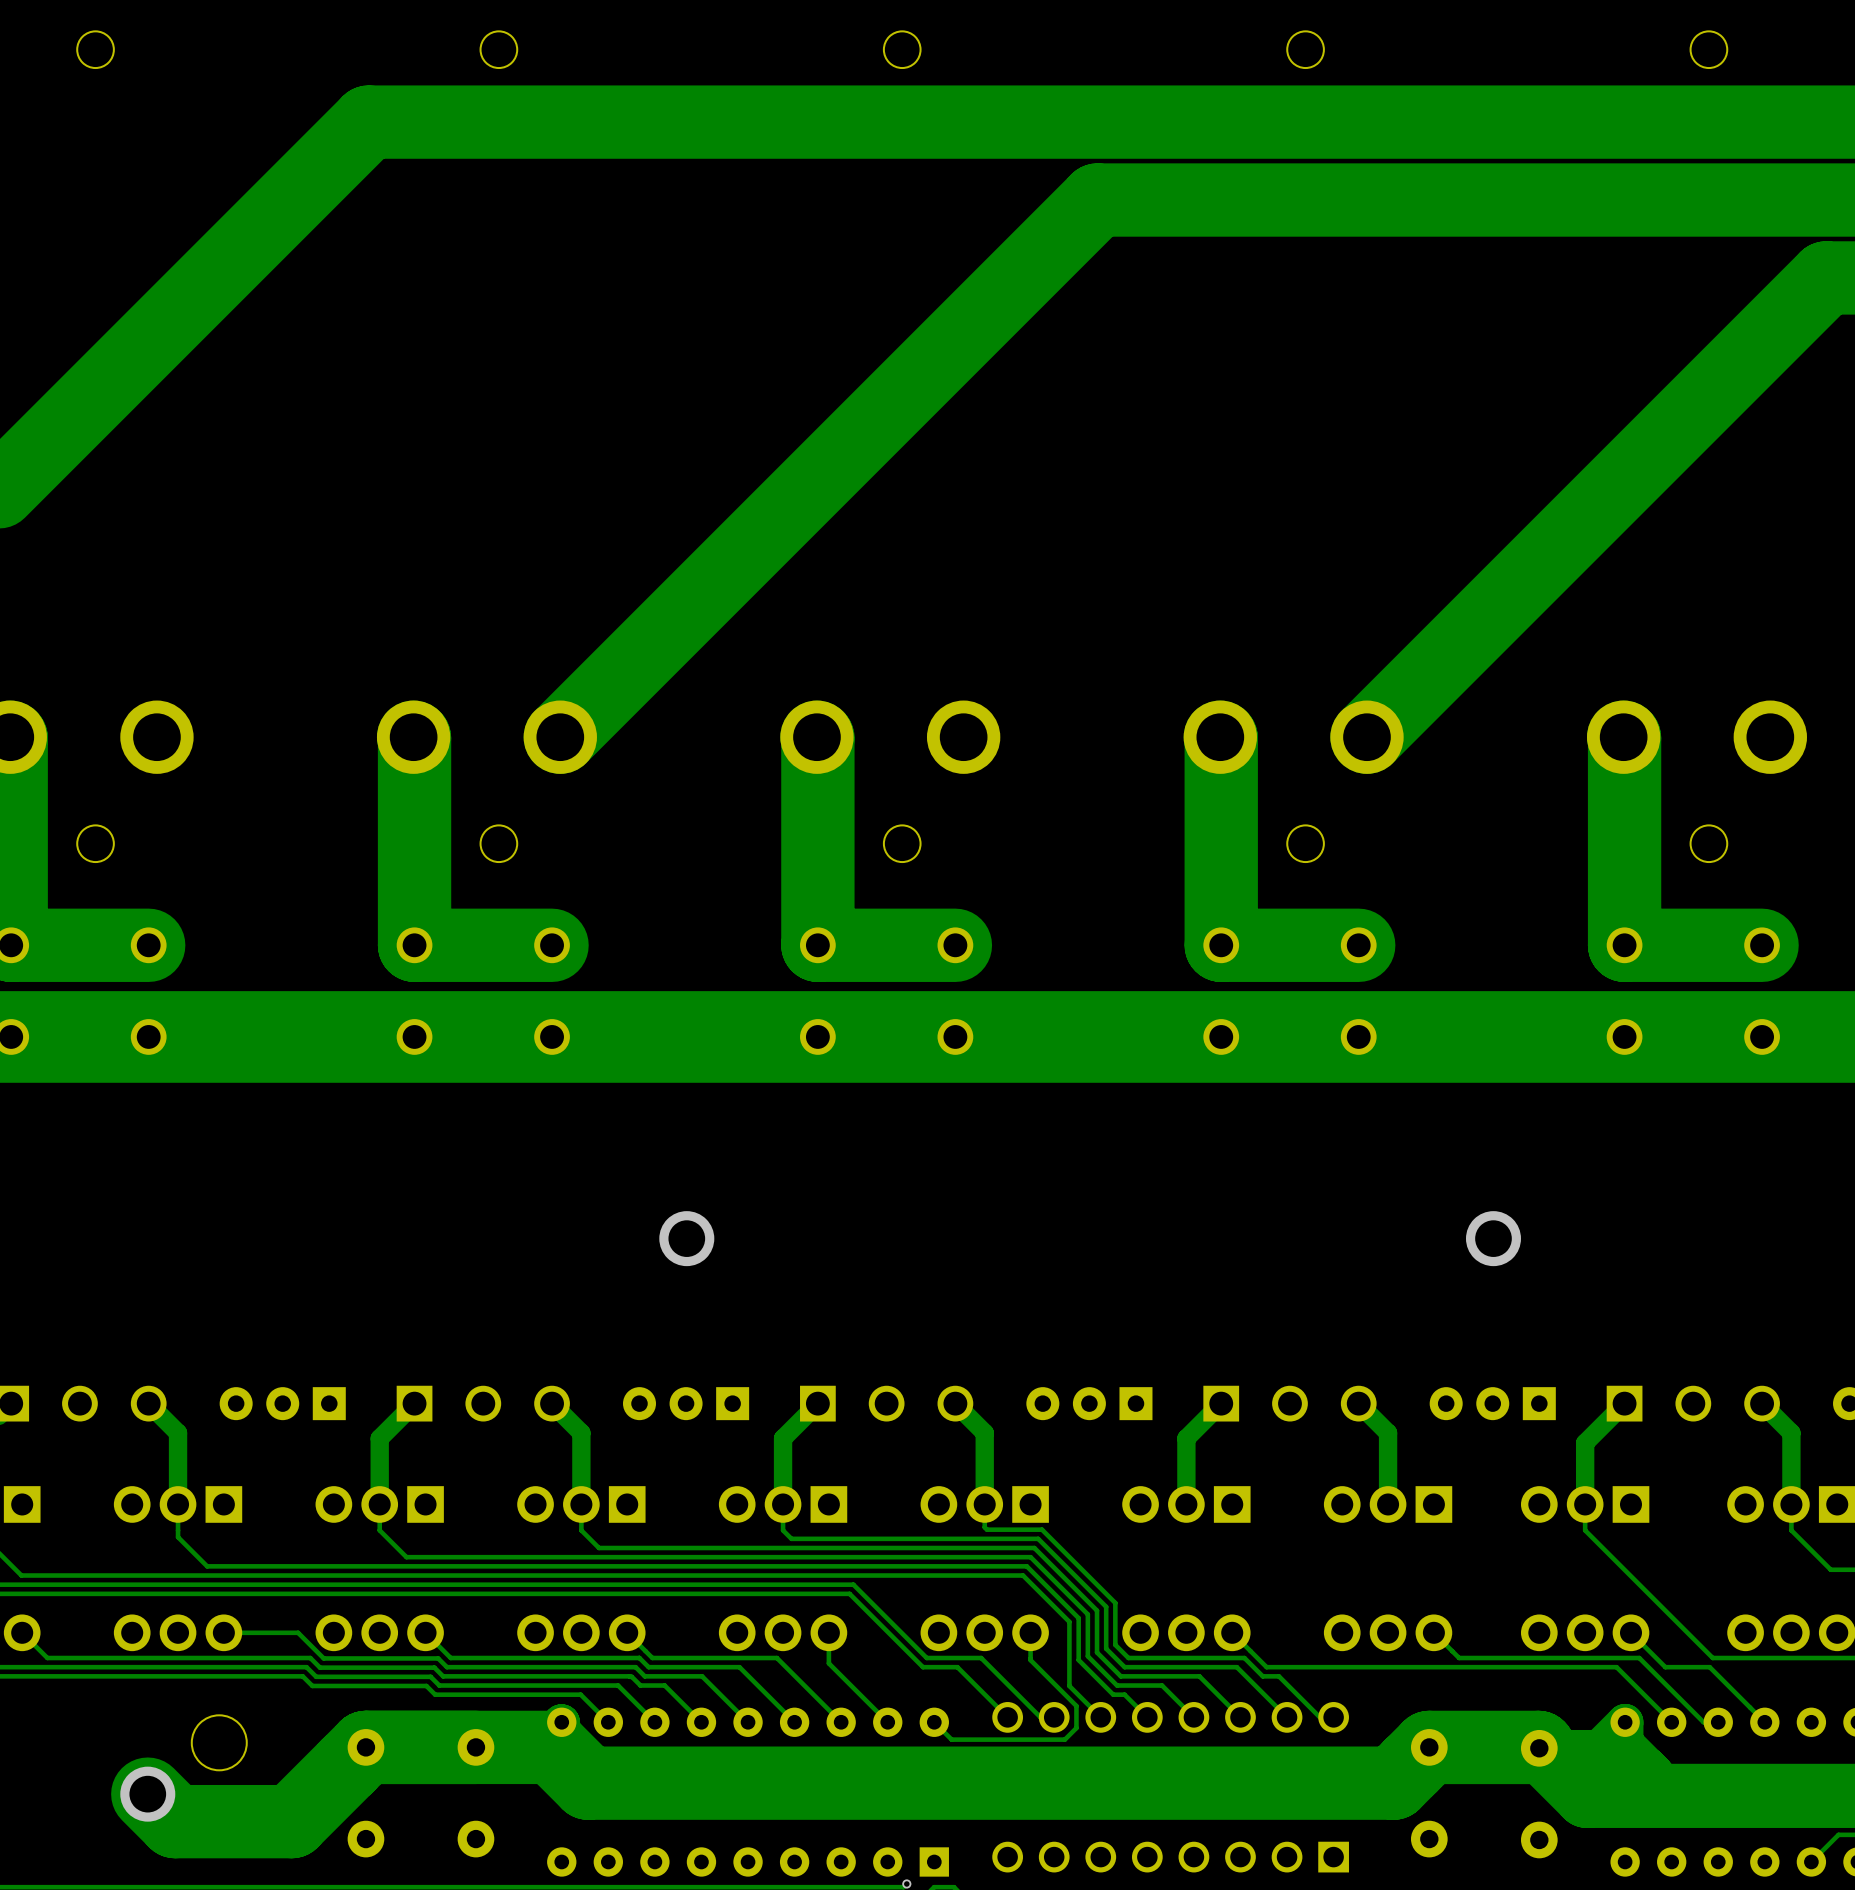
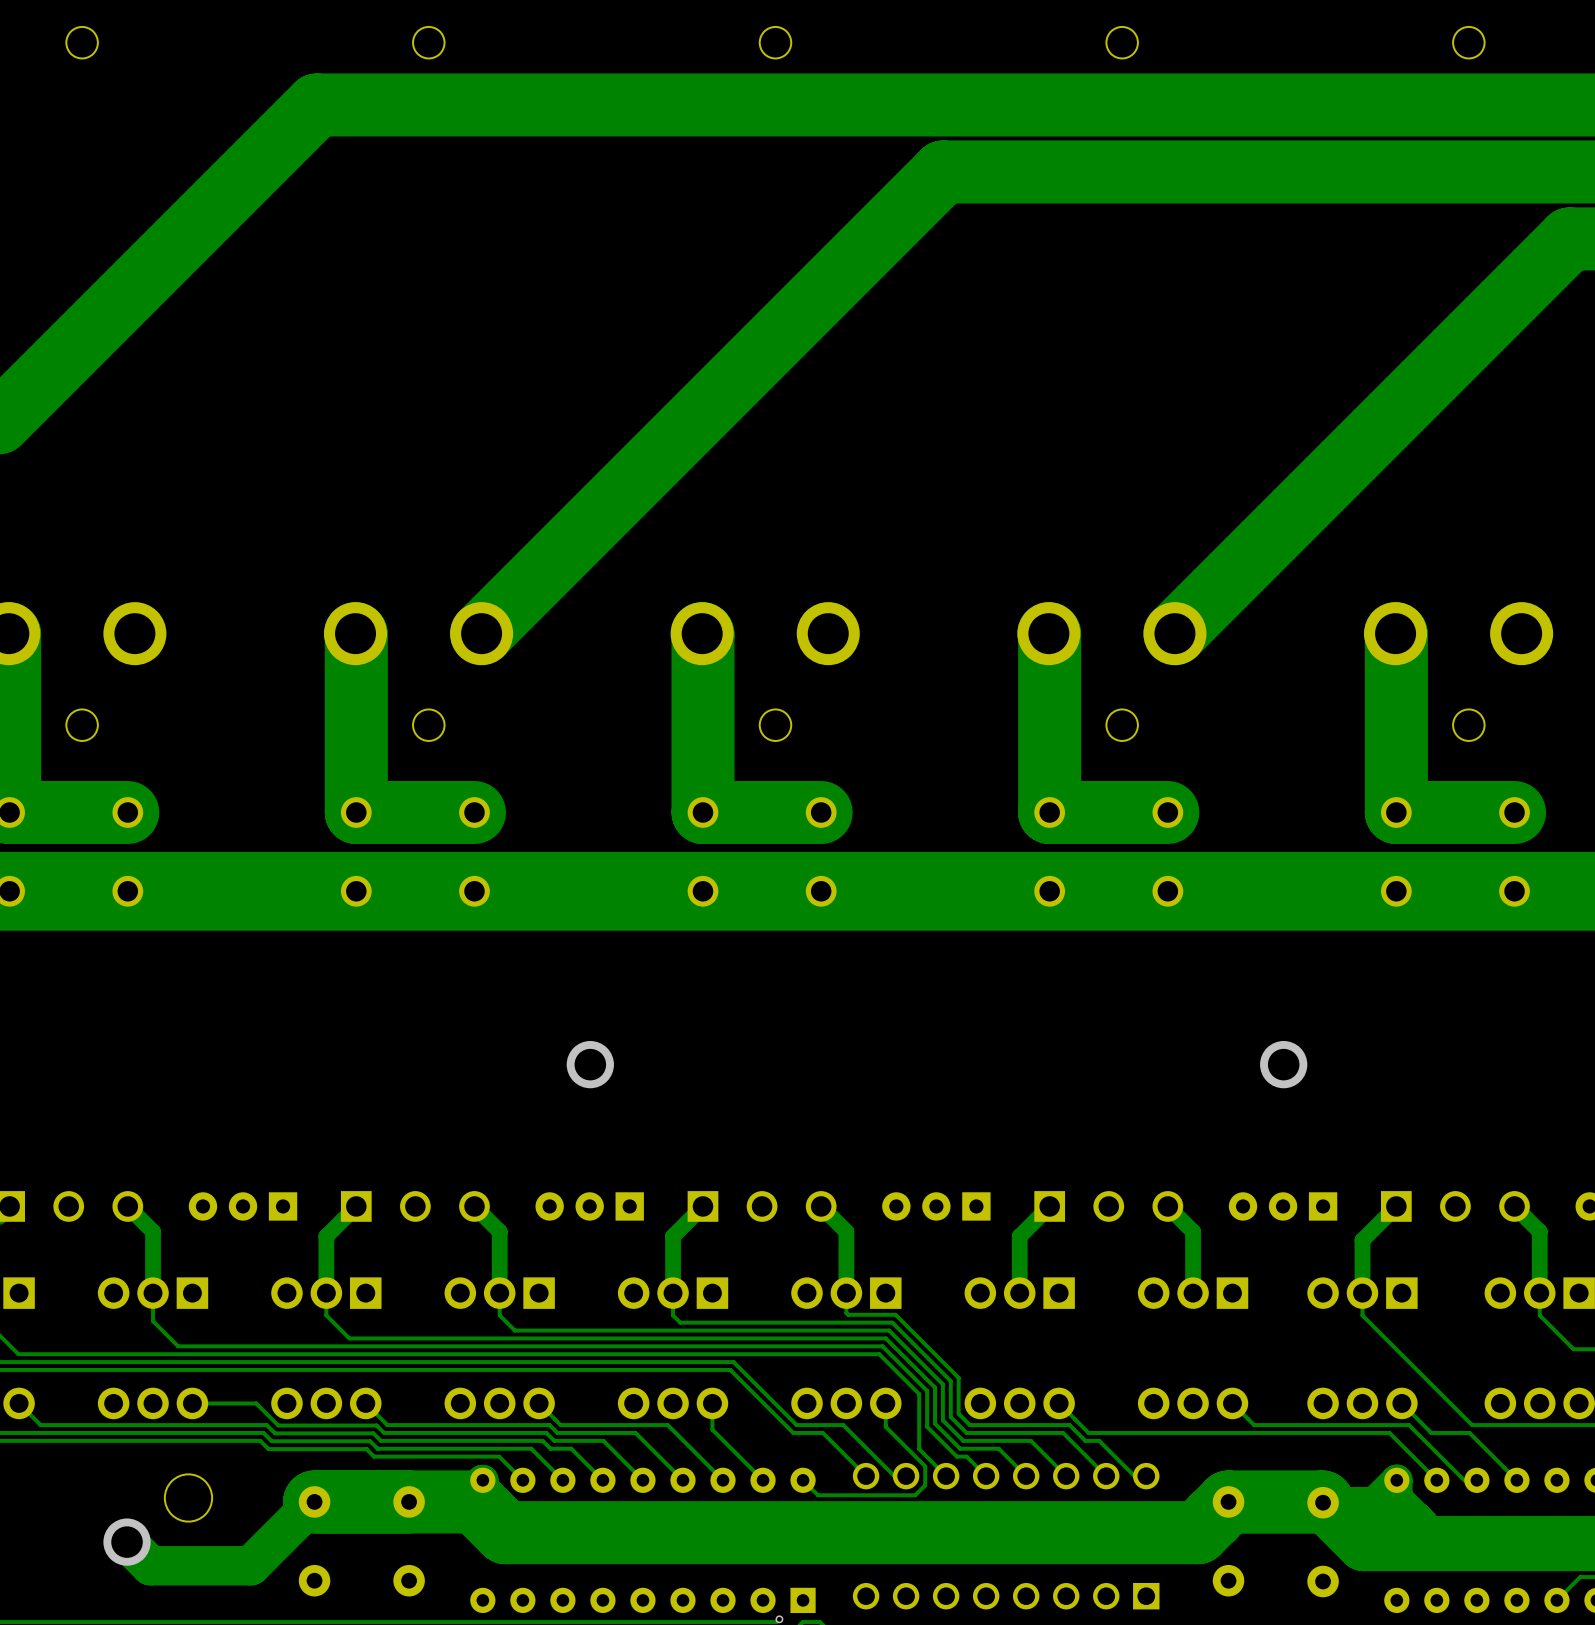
track width: thick (365, 1747) (291, 1821) (175, 1821) (147, 1794) -> thin (314, 1501) (250, 1565) (150, 1565) (127, 1542)

